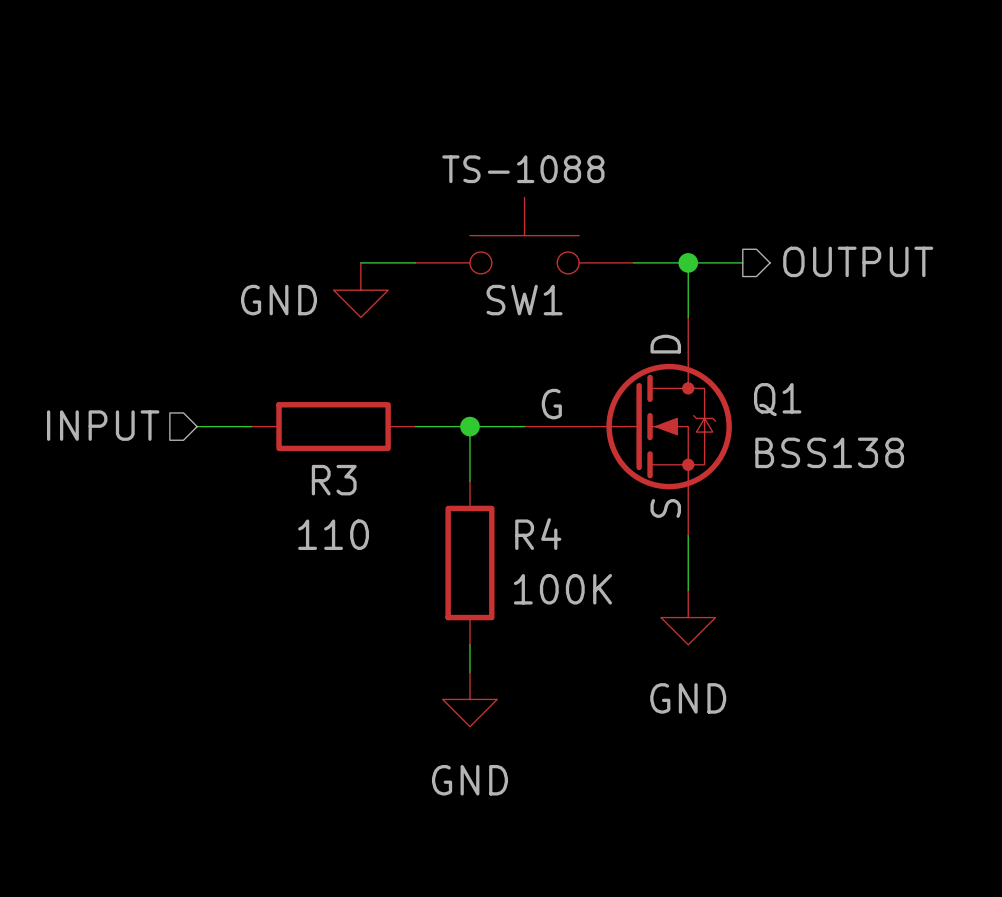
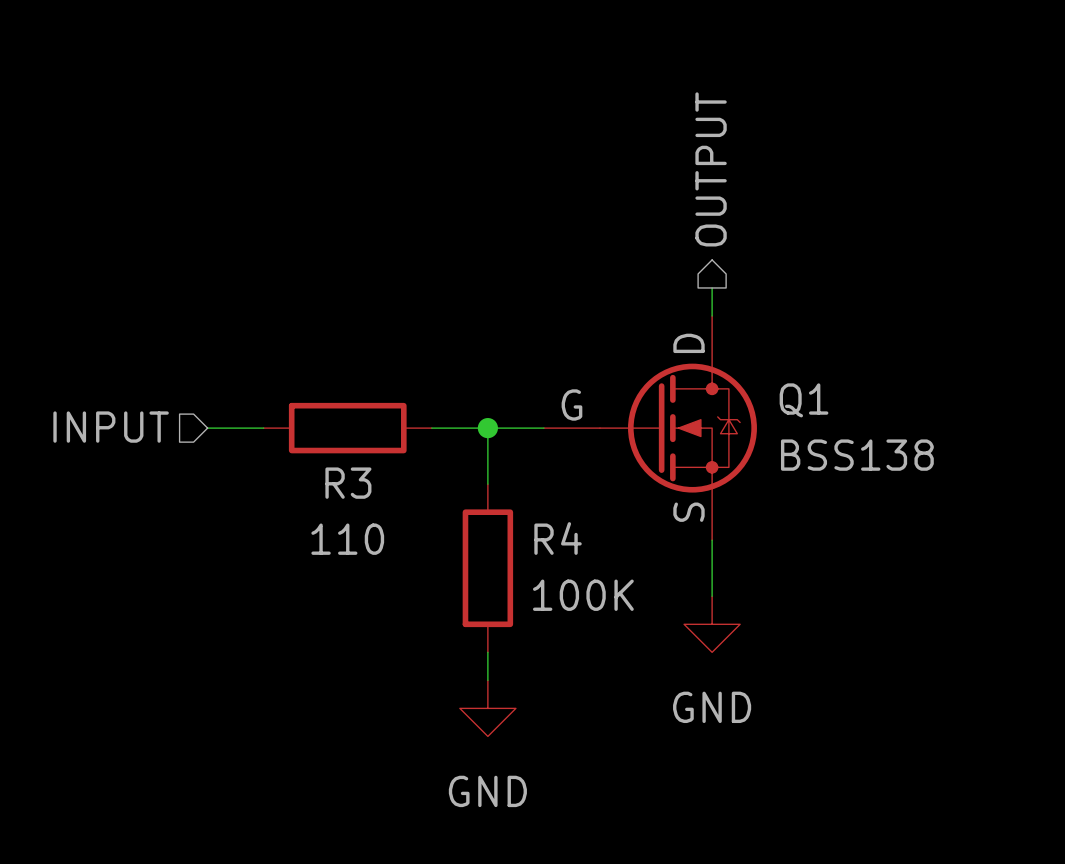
SW1: TS-1088 (524, 235) -> none
hierarchical label rotation: 0° (858, 261) -> 90° counterclockwise (711, 169)
hierarchical label position: OUTPUT (858, 261) -> OUTPUT (711, 169)
wire: (360, 262) (415, 262) -> none
wire: (633, 262) (742, 262) -> none
wire: (688, 262) (688, 290) -> none
junction: (688, 262) -> none
power symbol: GND (360, 290) -> none

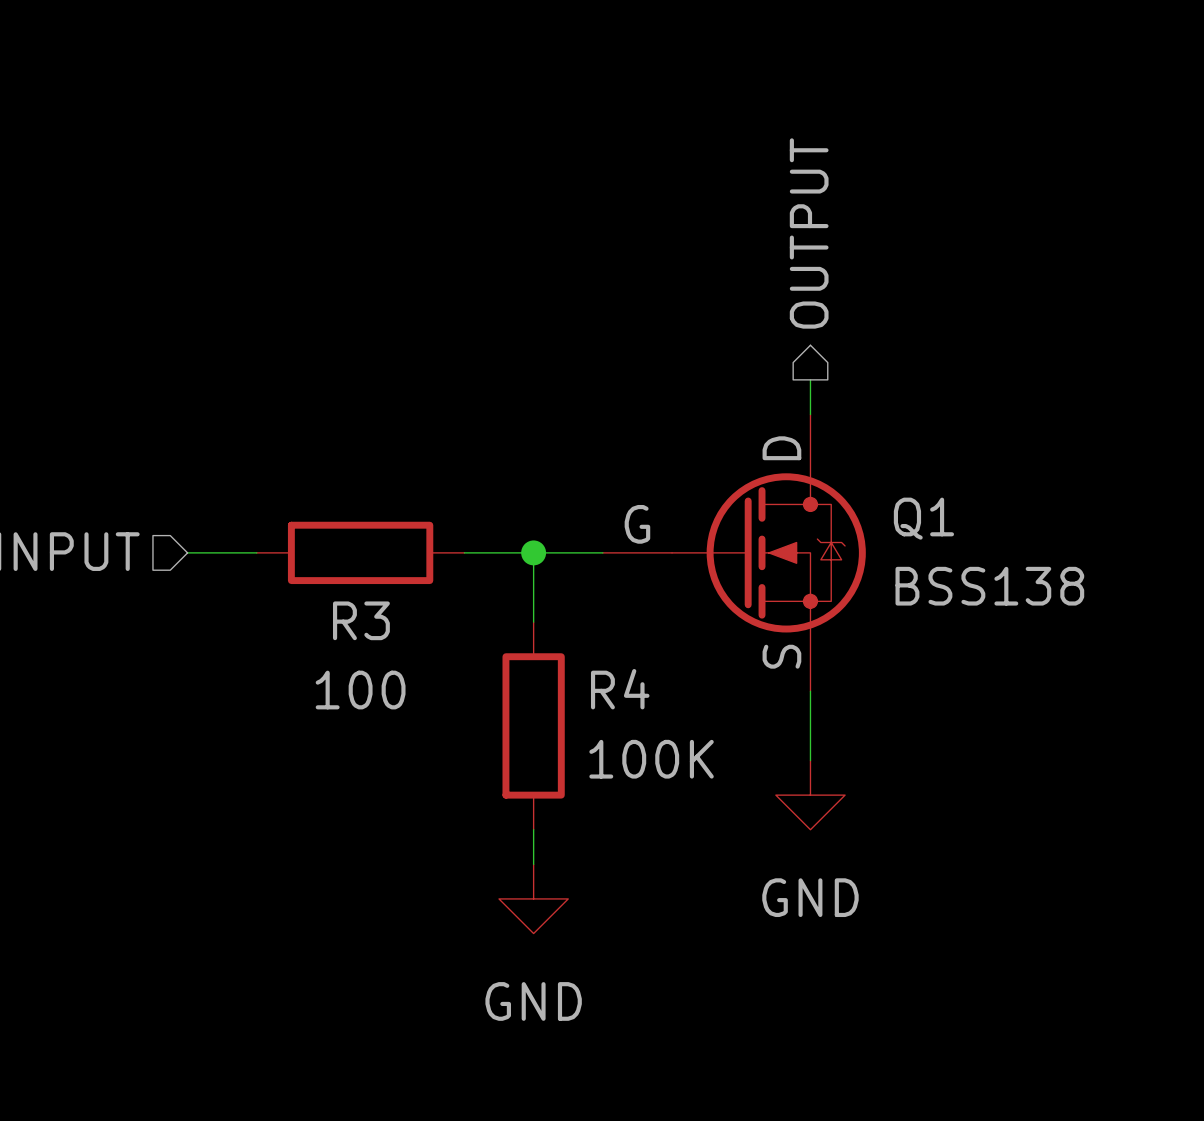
R3 value: 110 (347, 539) -> 100 (360, 690)

